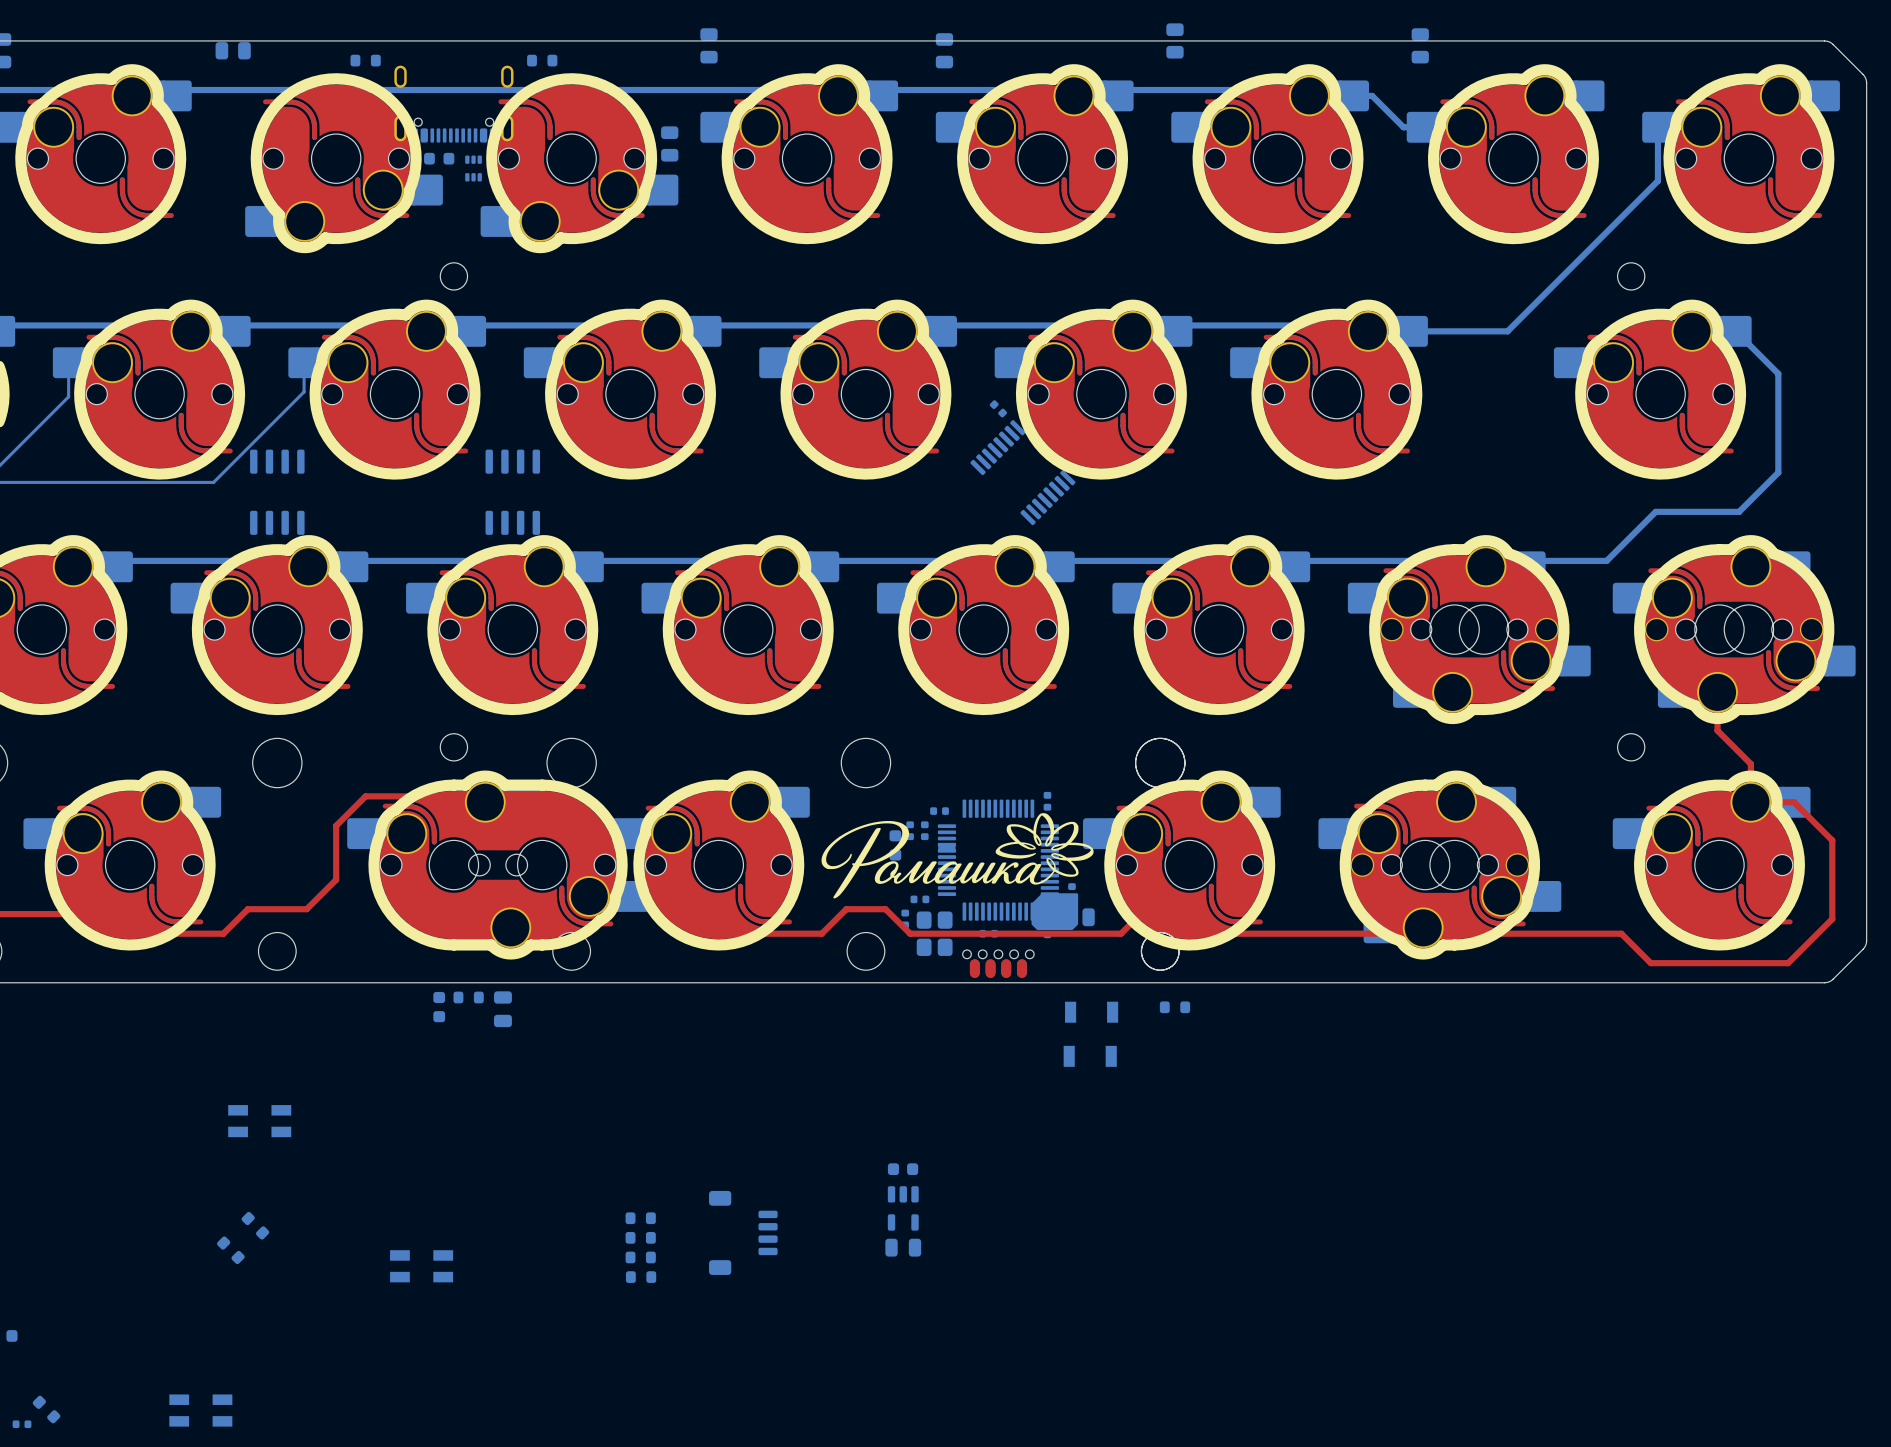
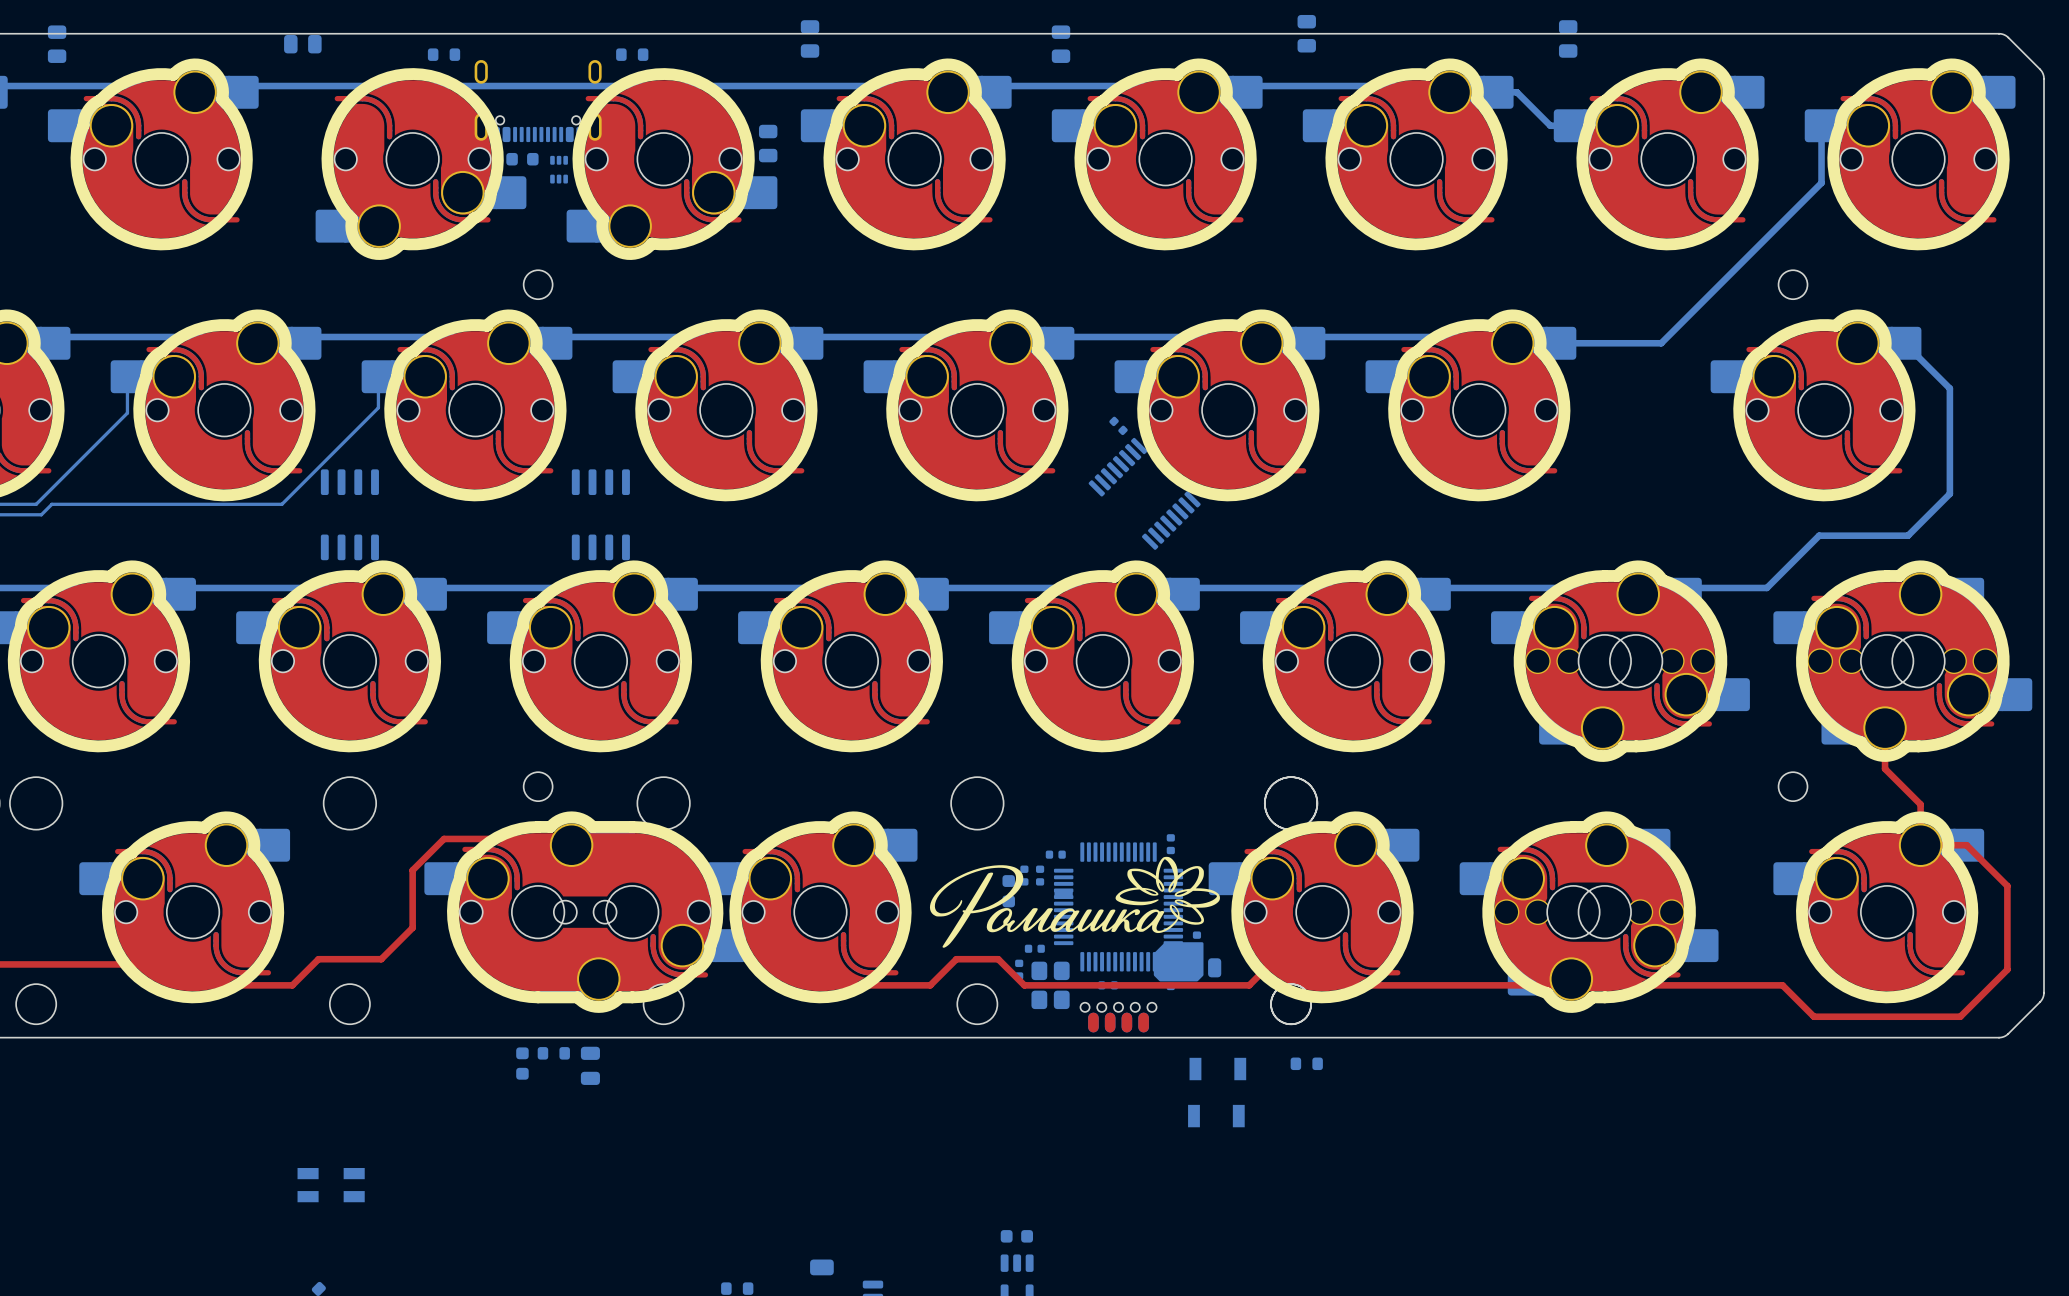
part footprint: [1347, 535, 1591, 725] -> [1491, 560, 1750, 762]
part footprint: [1612, 535, 1856, 725] -> [1773, 560, 2033, 762]
part footprint: [1318, 770, 1562, 960] -> [1459, 811, 1719, 1013]

